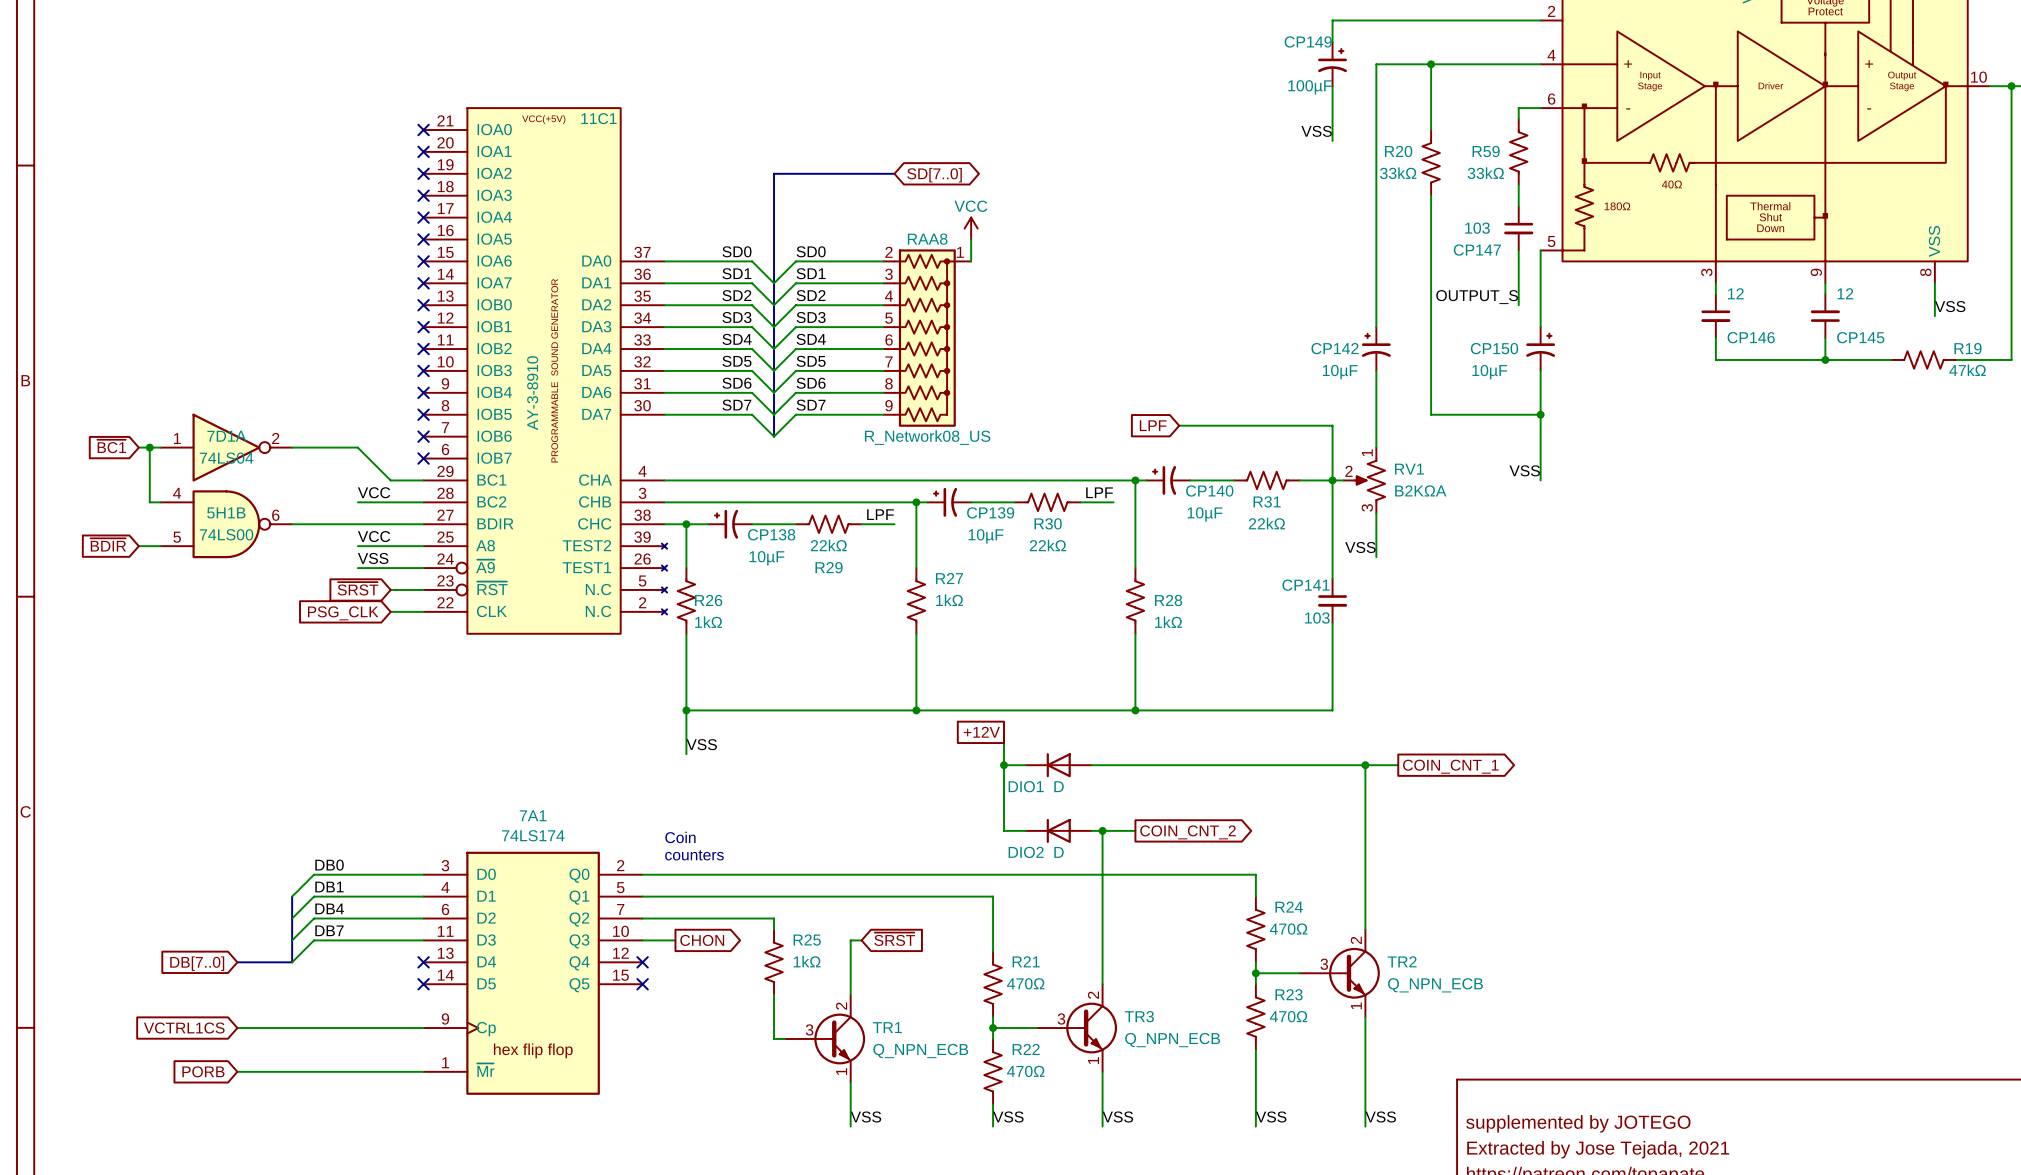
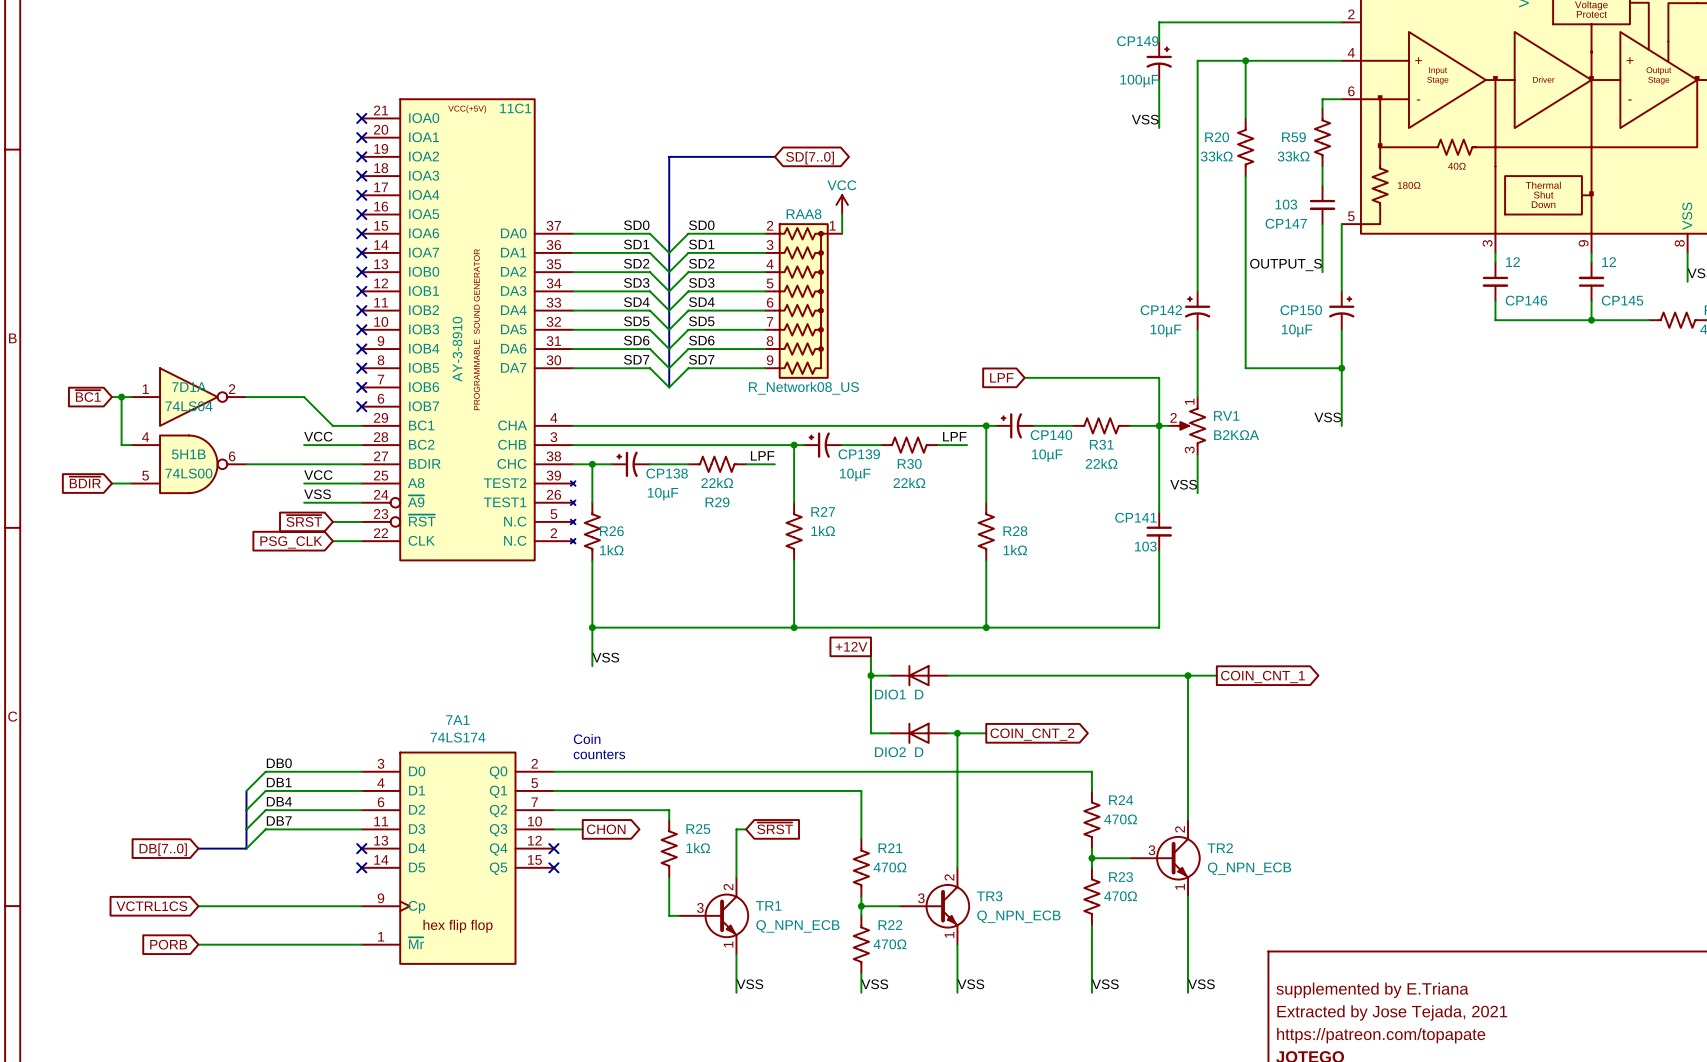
title block: supplemented by JOTEGO (1578, 1123) -> supplemented by E.Triana (1372, 990)

